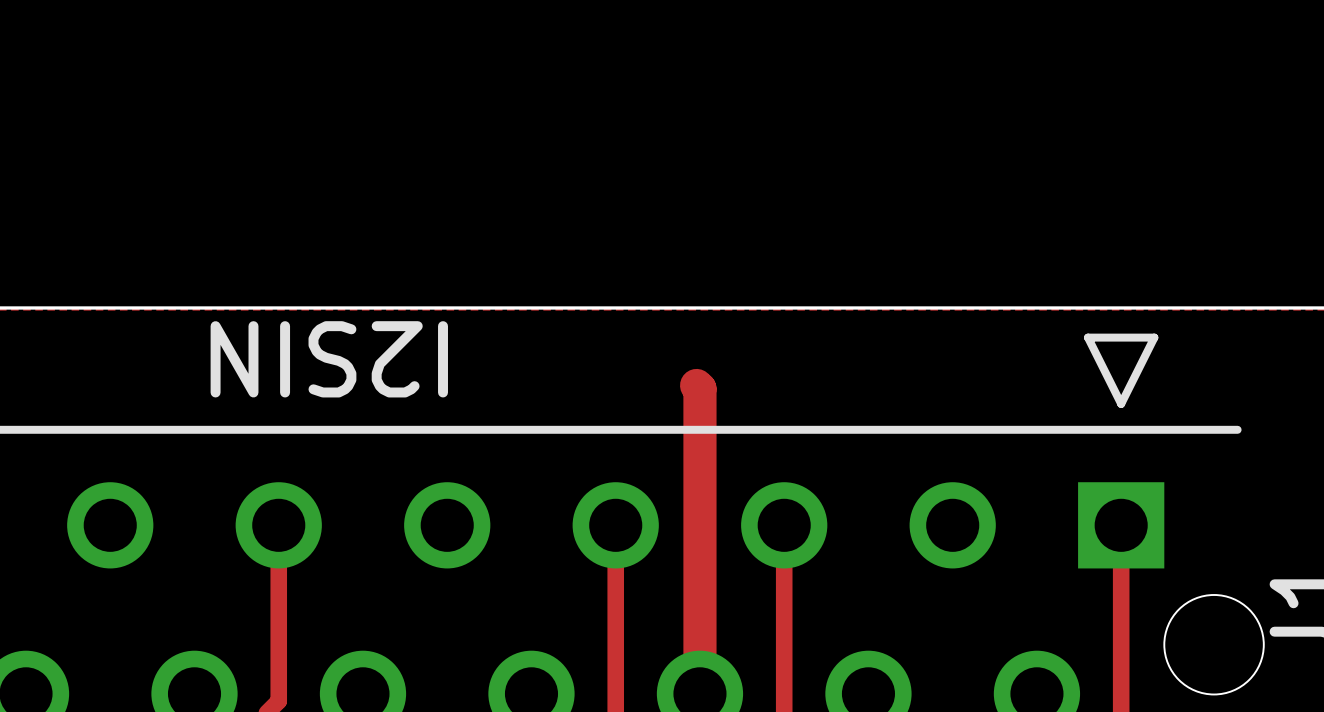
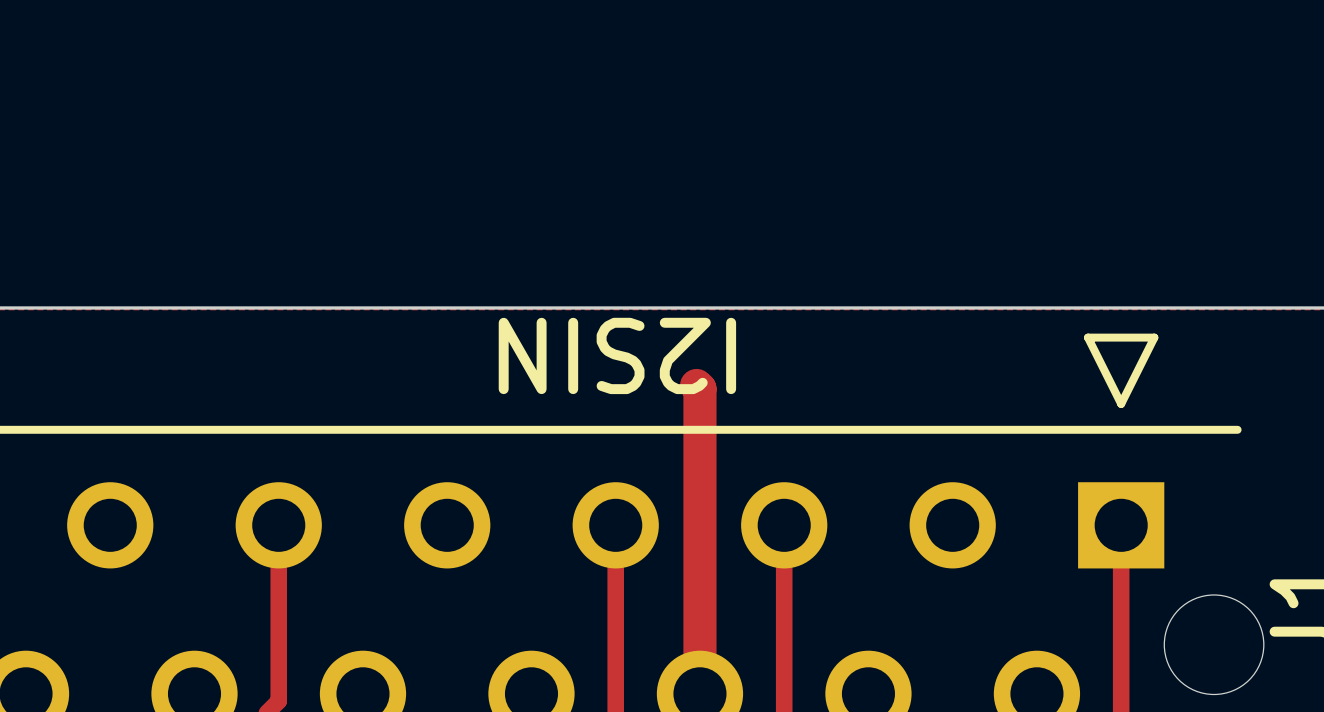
text position: I2SIN (329, 359) -> I2SIN (617, 355)

